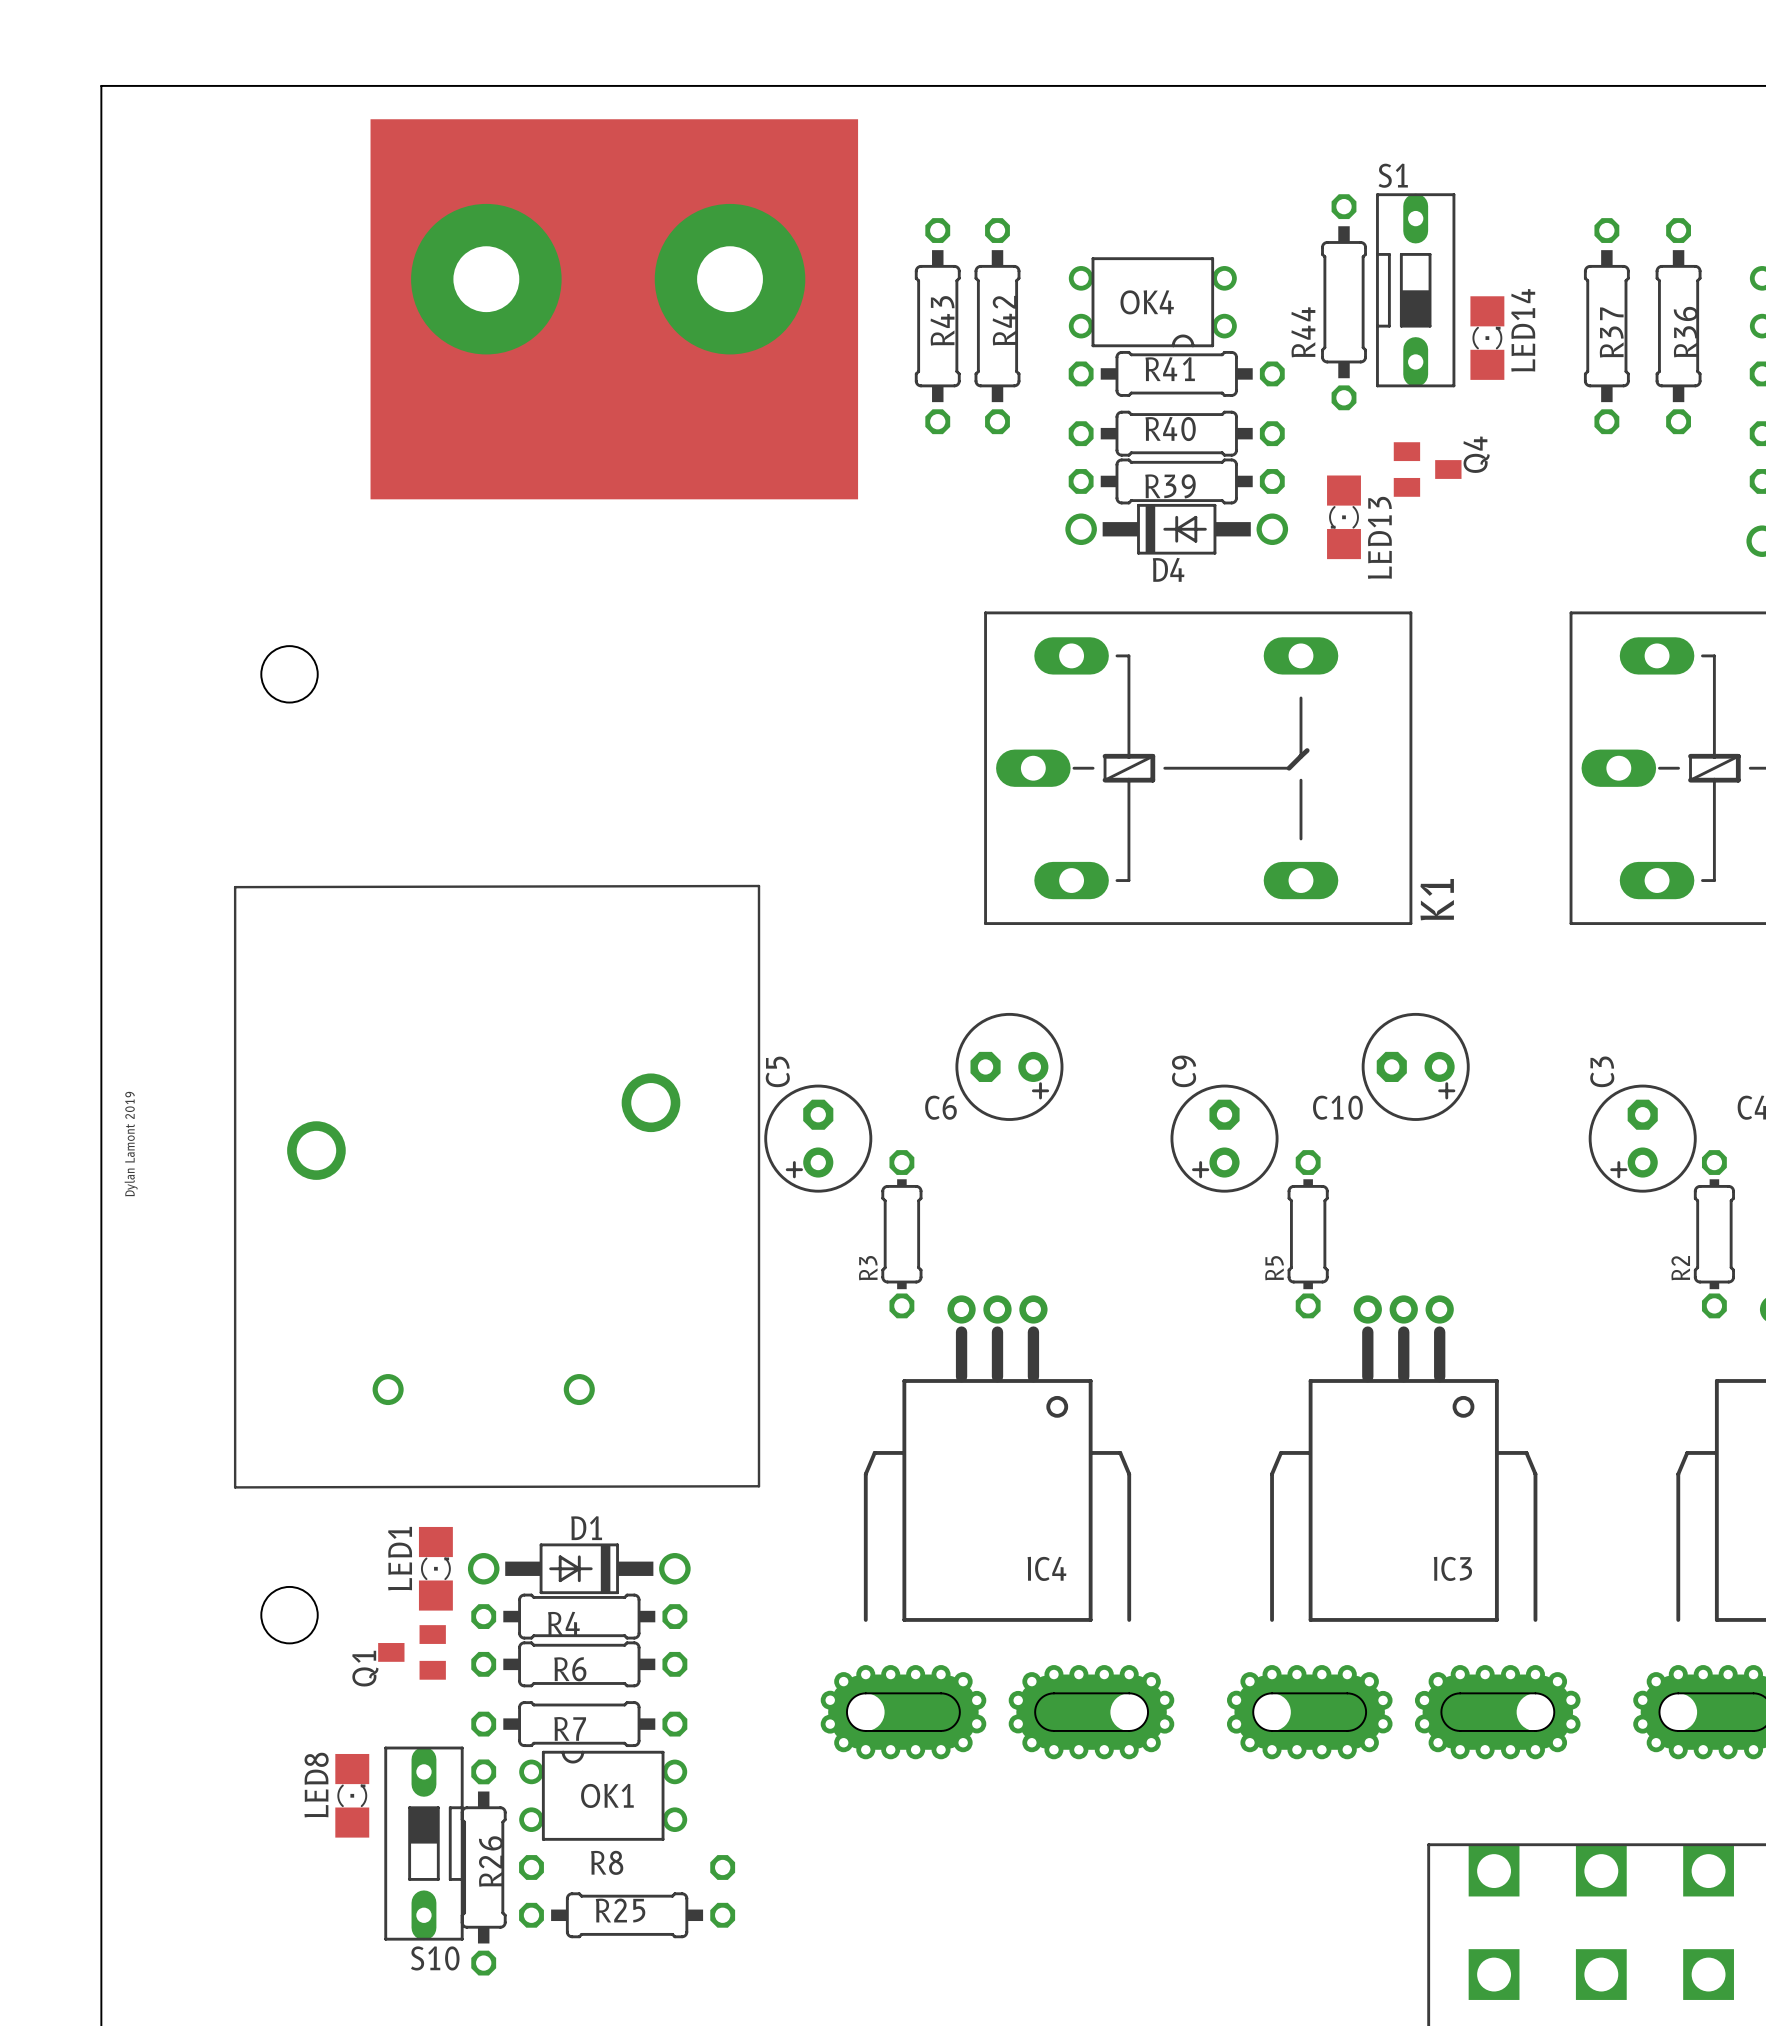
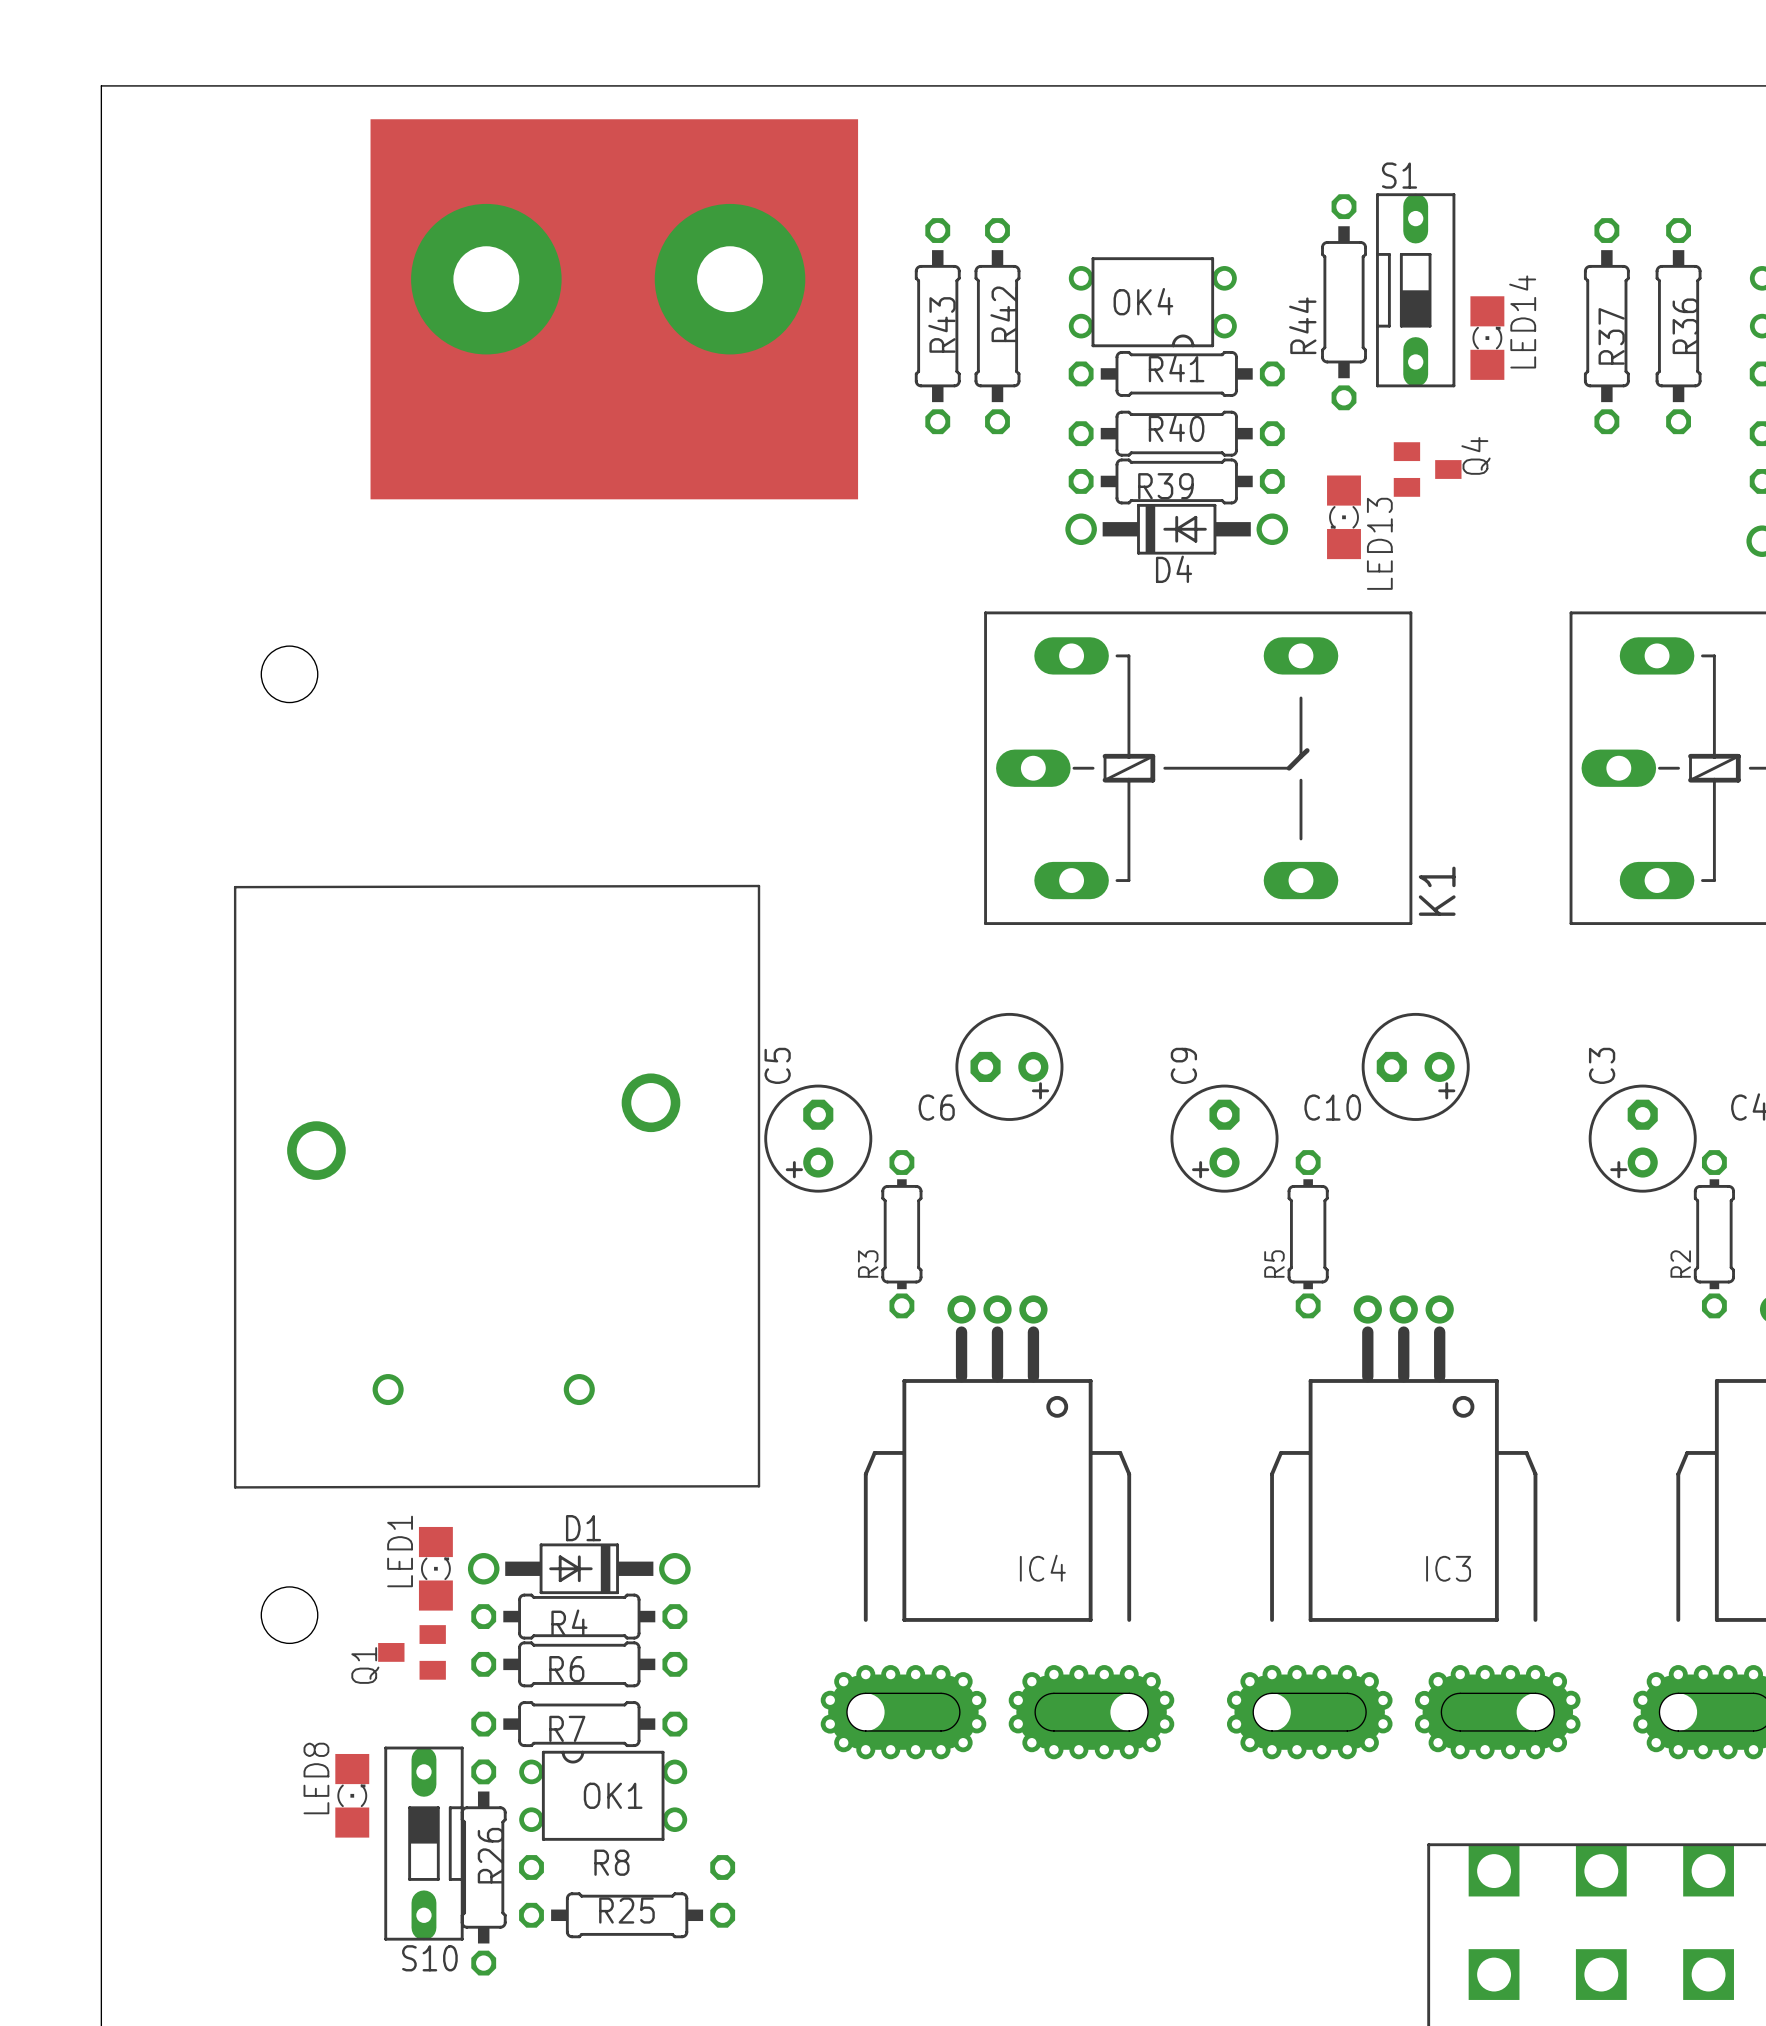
text: Dylan Lamont 2019 (131, 1144) -> none

